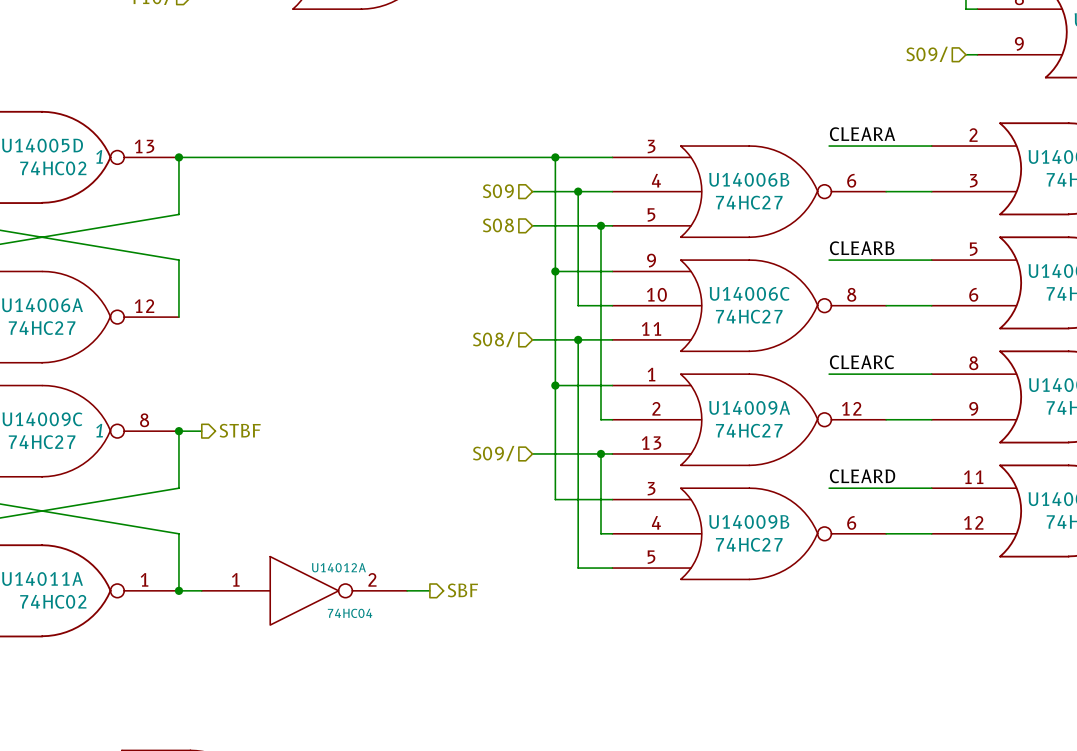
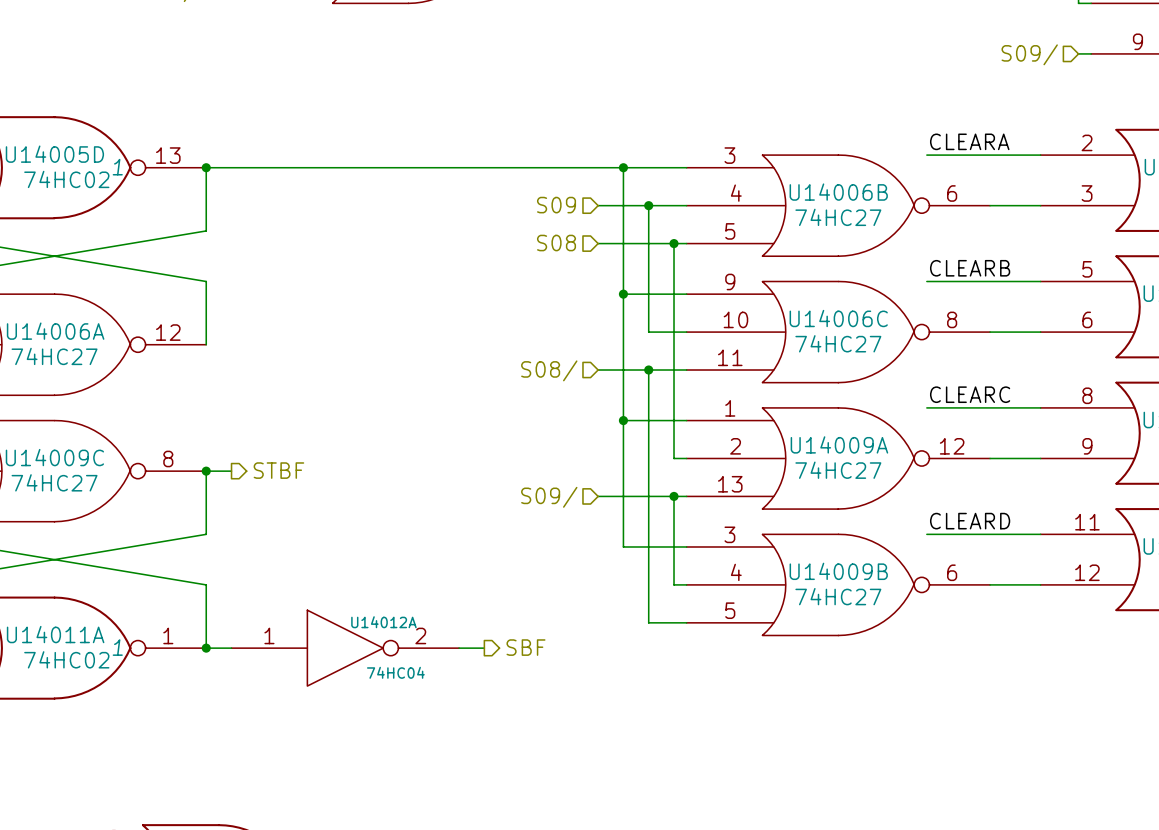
U14009C text: 1 (99, 430) -> none
U14011A text: none -> 1 (117, 647)

